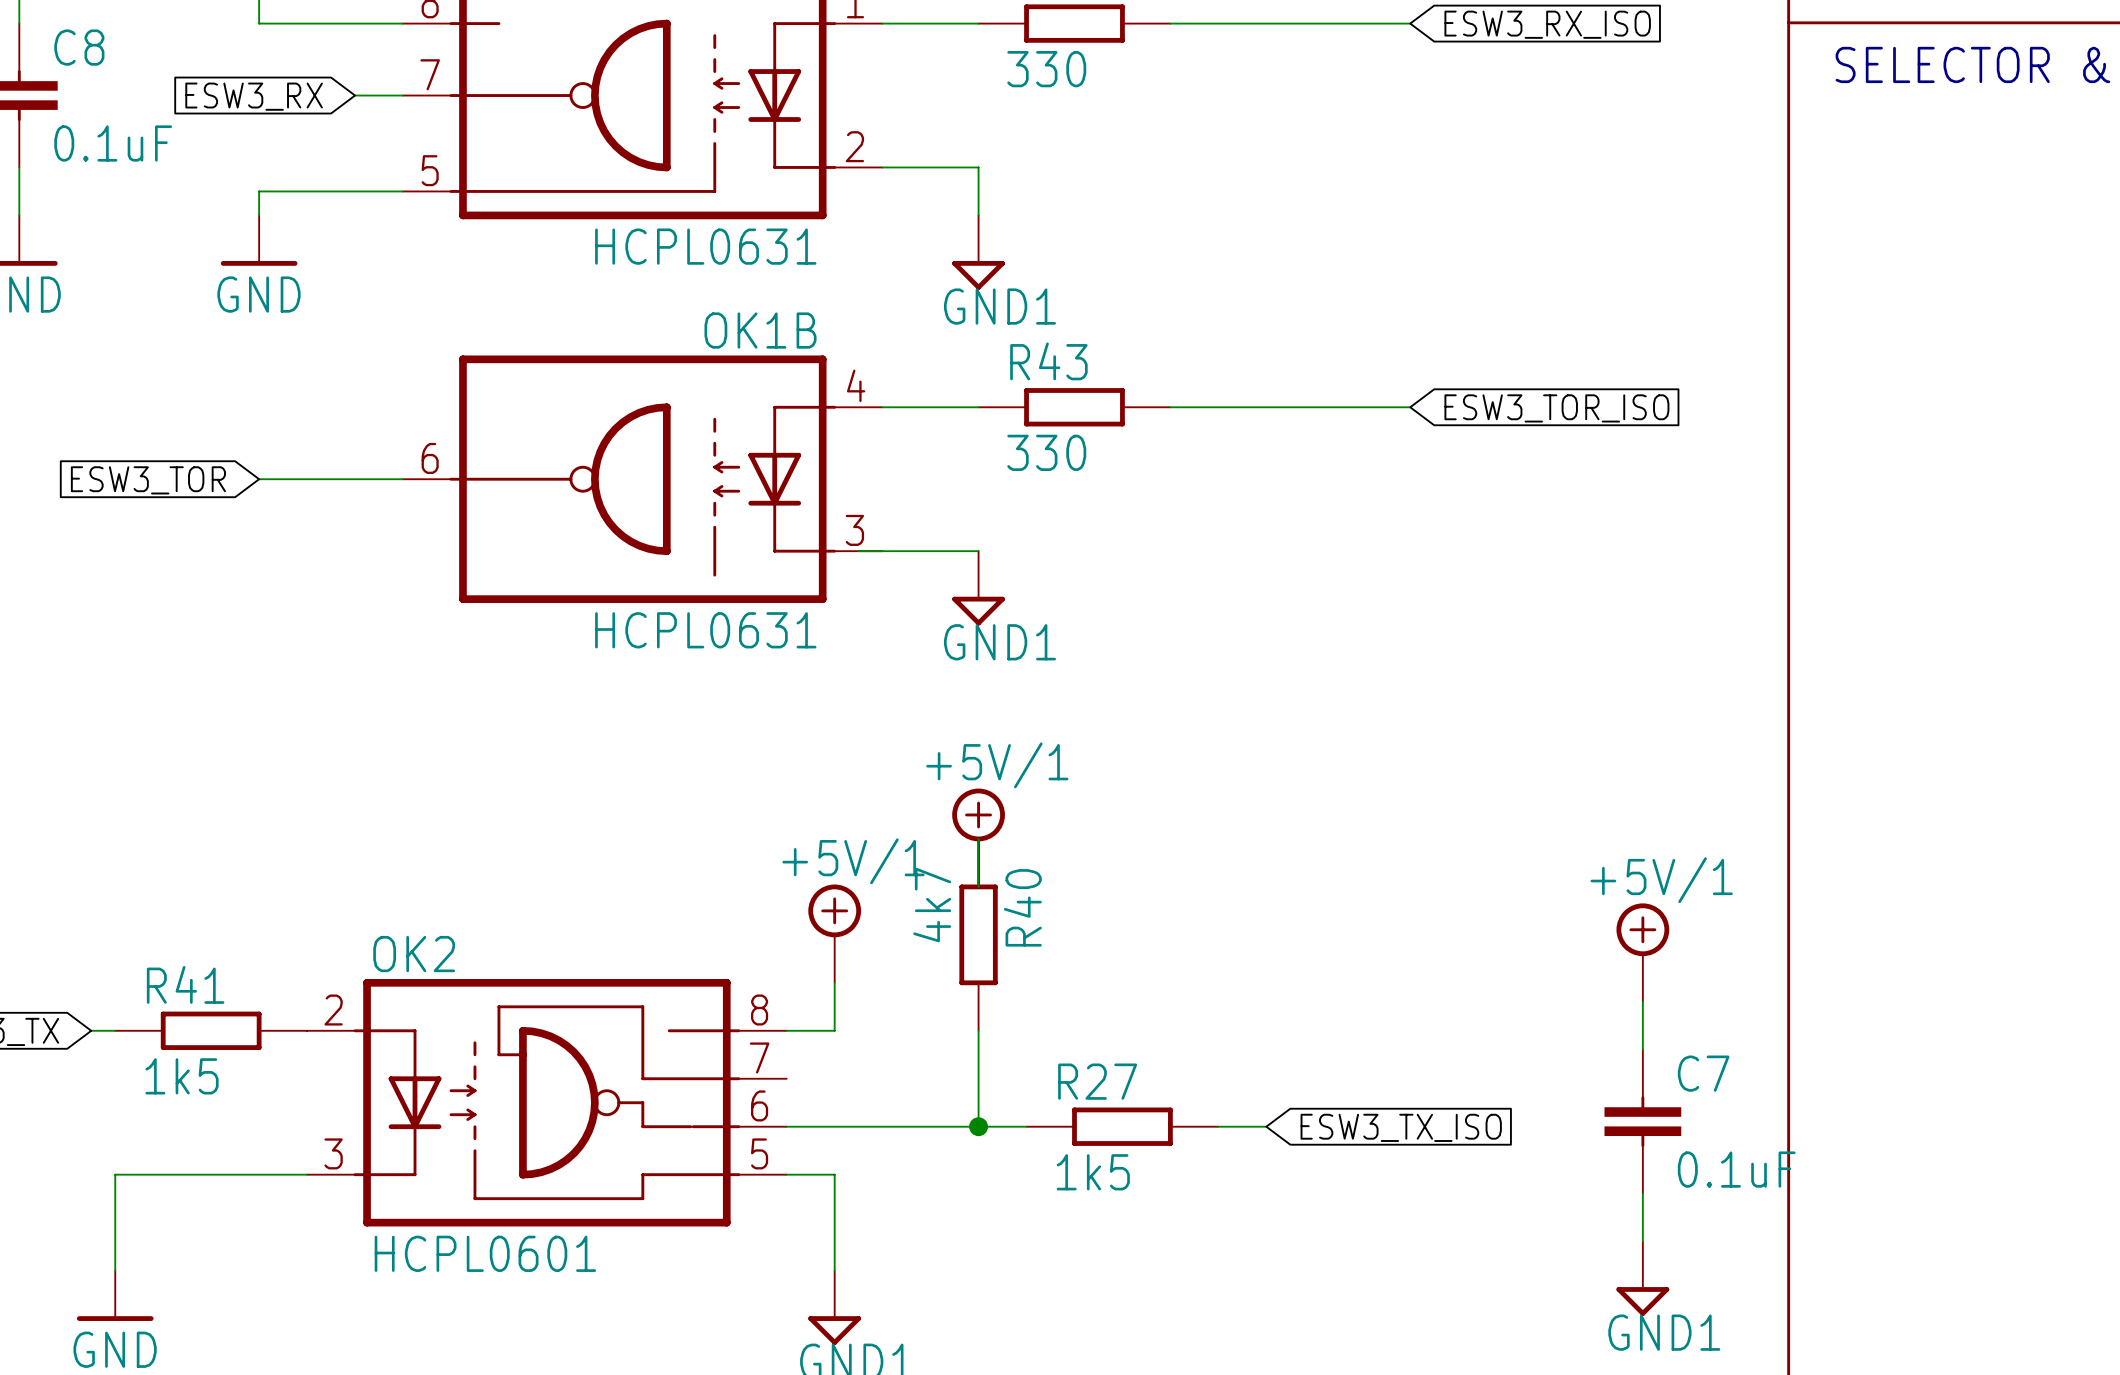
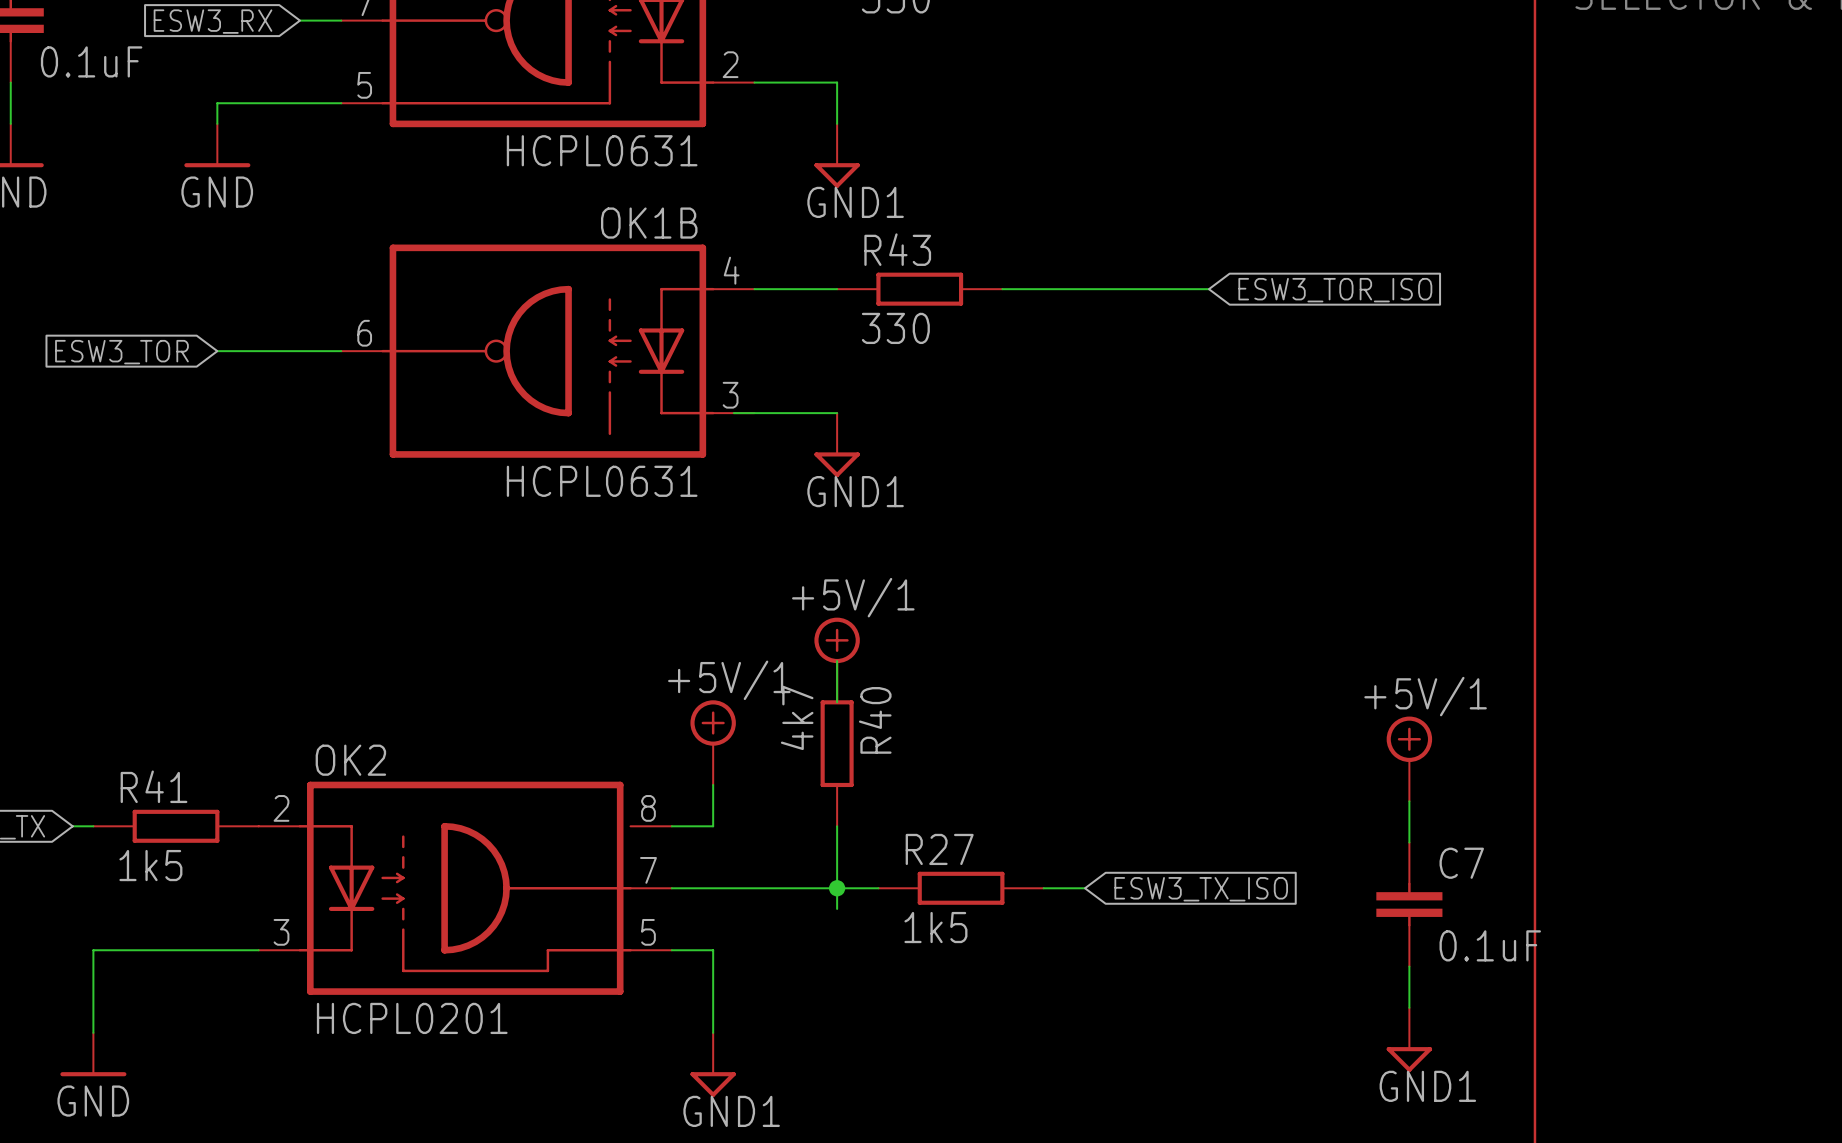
OK2 symbol: [307, 978, 787, 1227] -> [258, 781, 672, 995]
wire: (786, 1126) (1026, 1126) -> (671, 888) (878, 888)
junction position: (978, 1126) -> (837, 888)
R27 position: (1122, 1126) -> (961, 888)
wire: (1218, 1126) (1266, 1126) -> (1043, 888) (1085, 888)
global label position: ESW3_TX_ISO (1401, 1127) -> ESW3_TX_ISO (1201, 889)
OK2 value: HCPL0601 (485, 1253) -> HCPL0201 (412, 1018)

